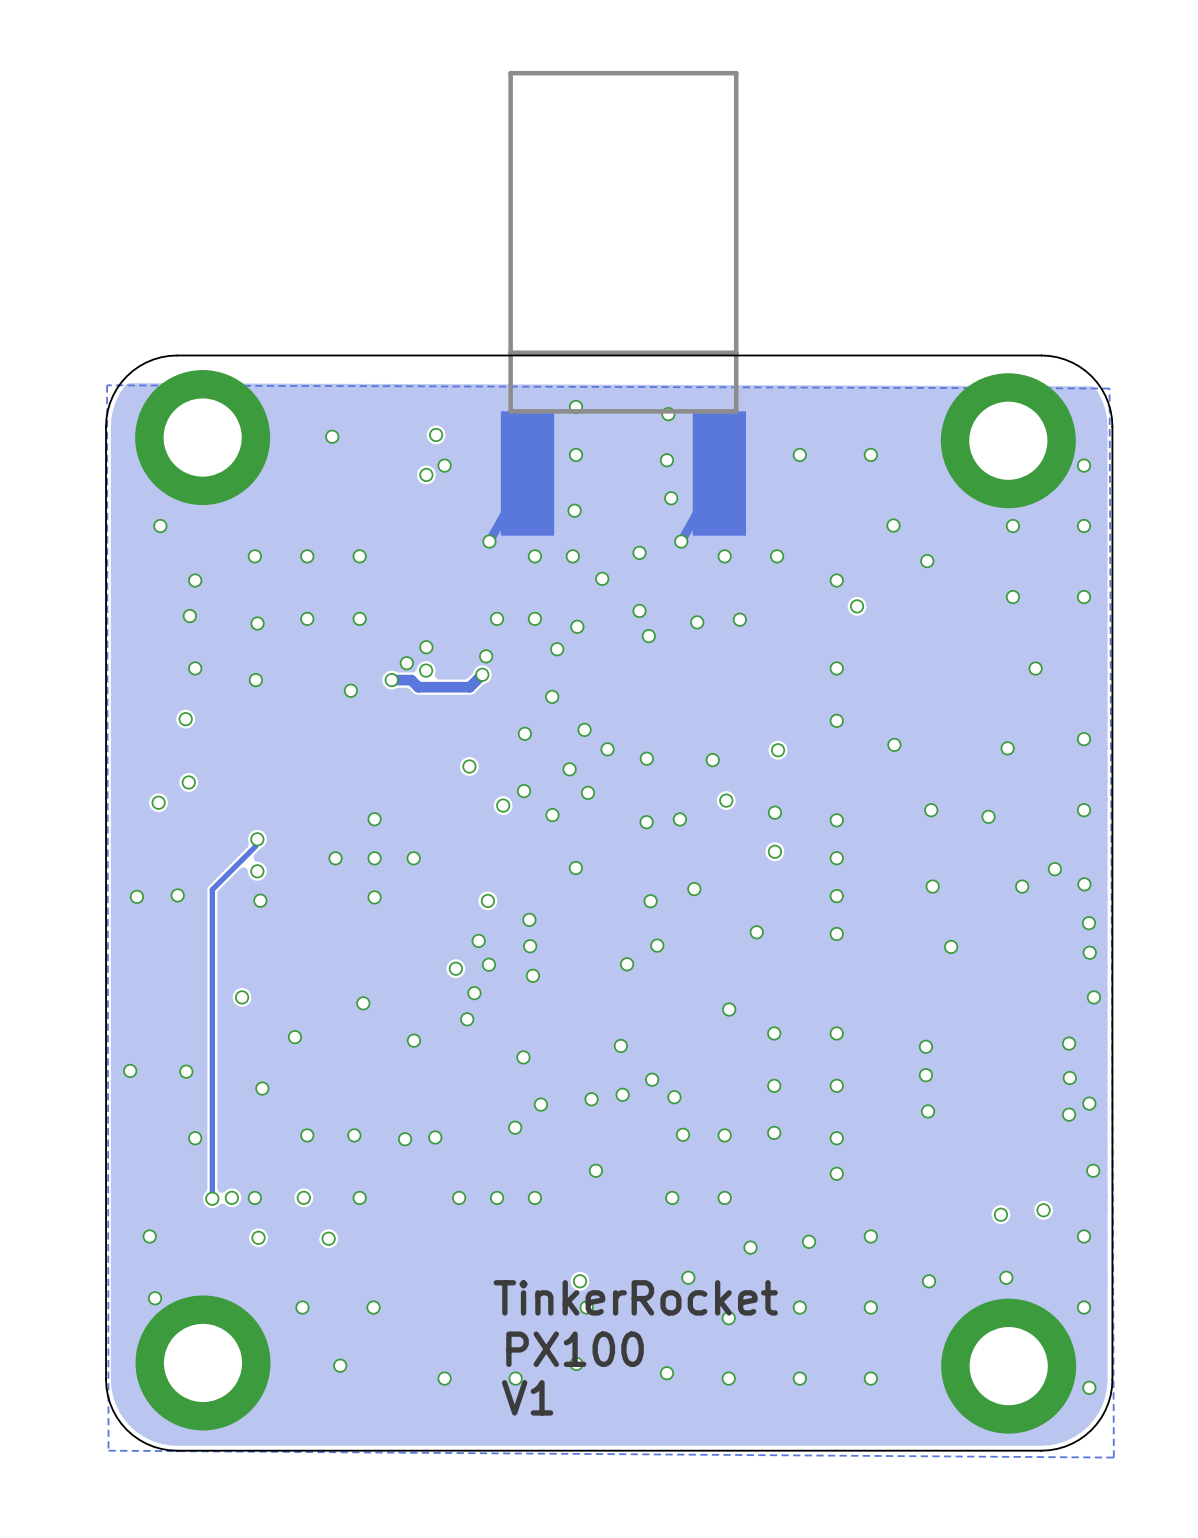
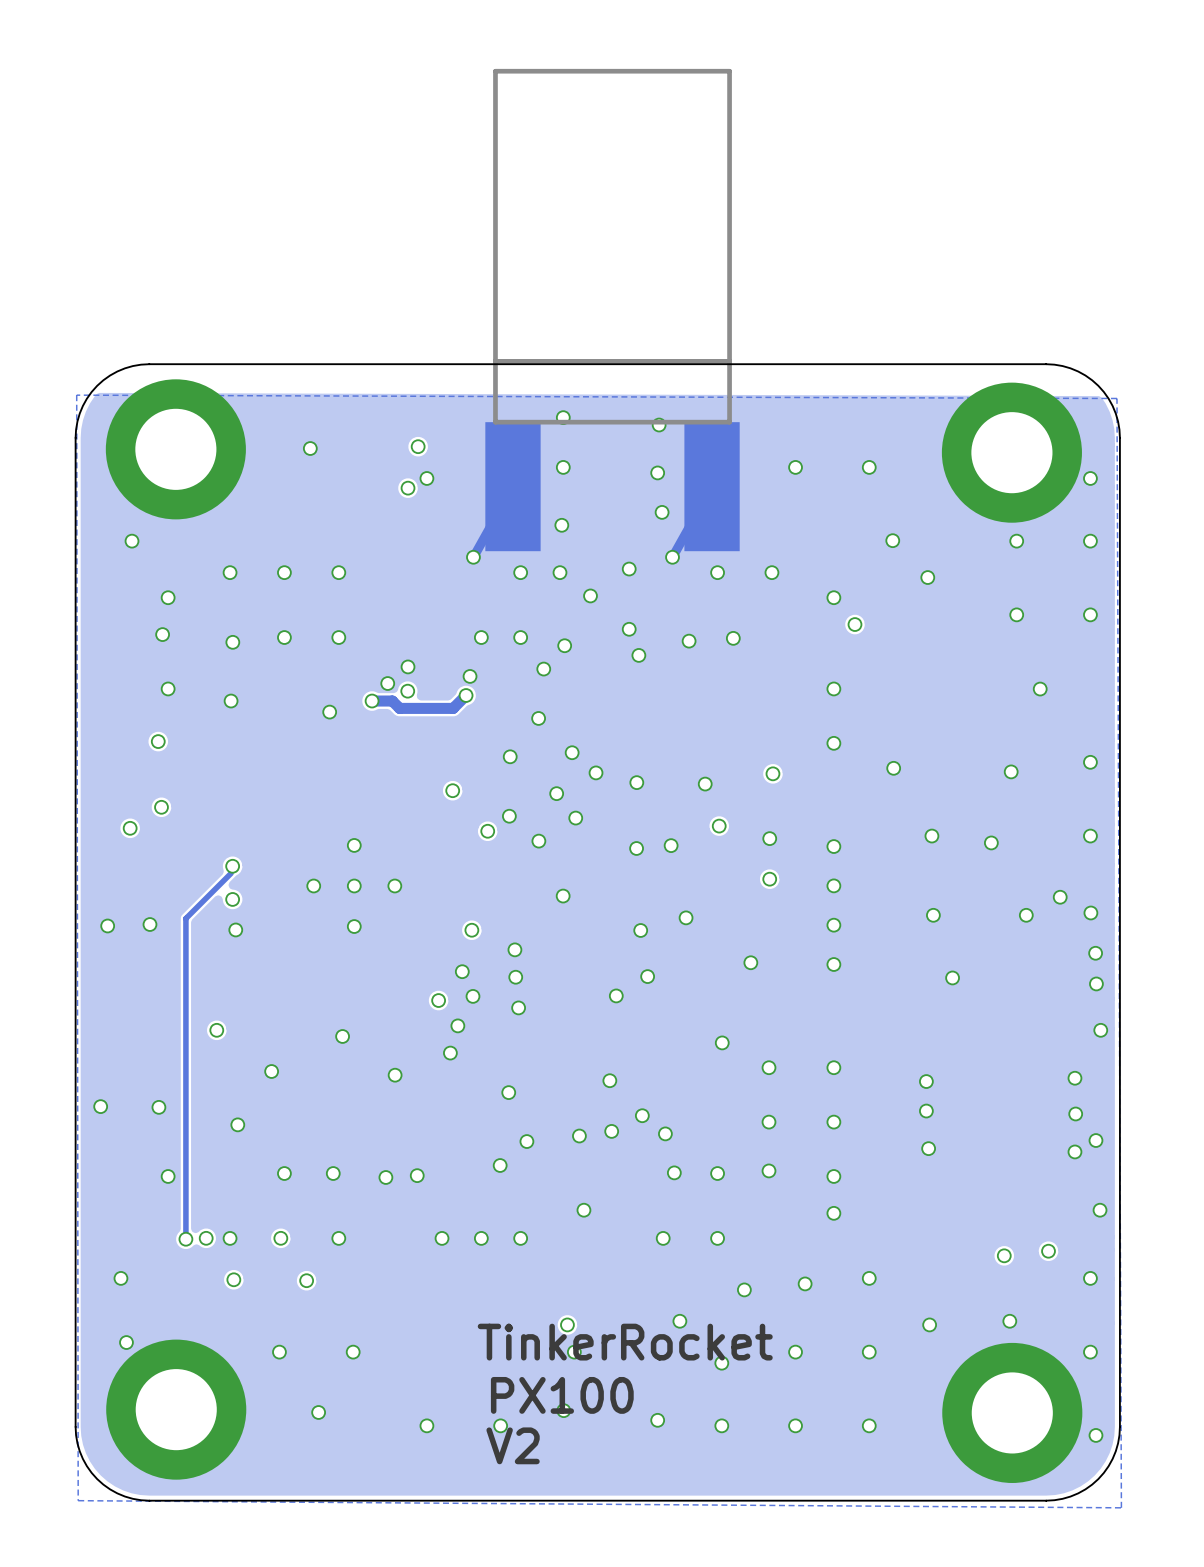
text: V1 (527, 1397) -> V2 (513, 1445)

